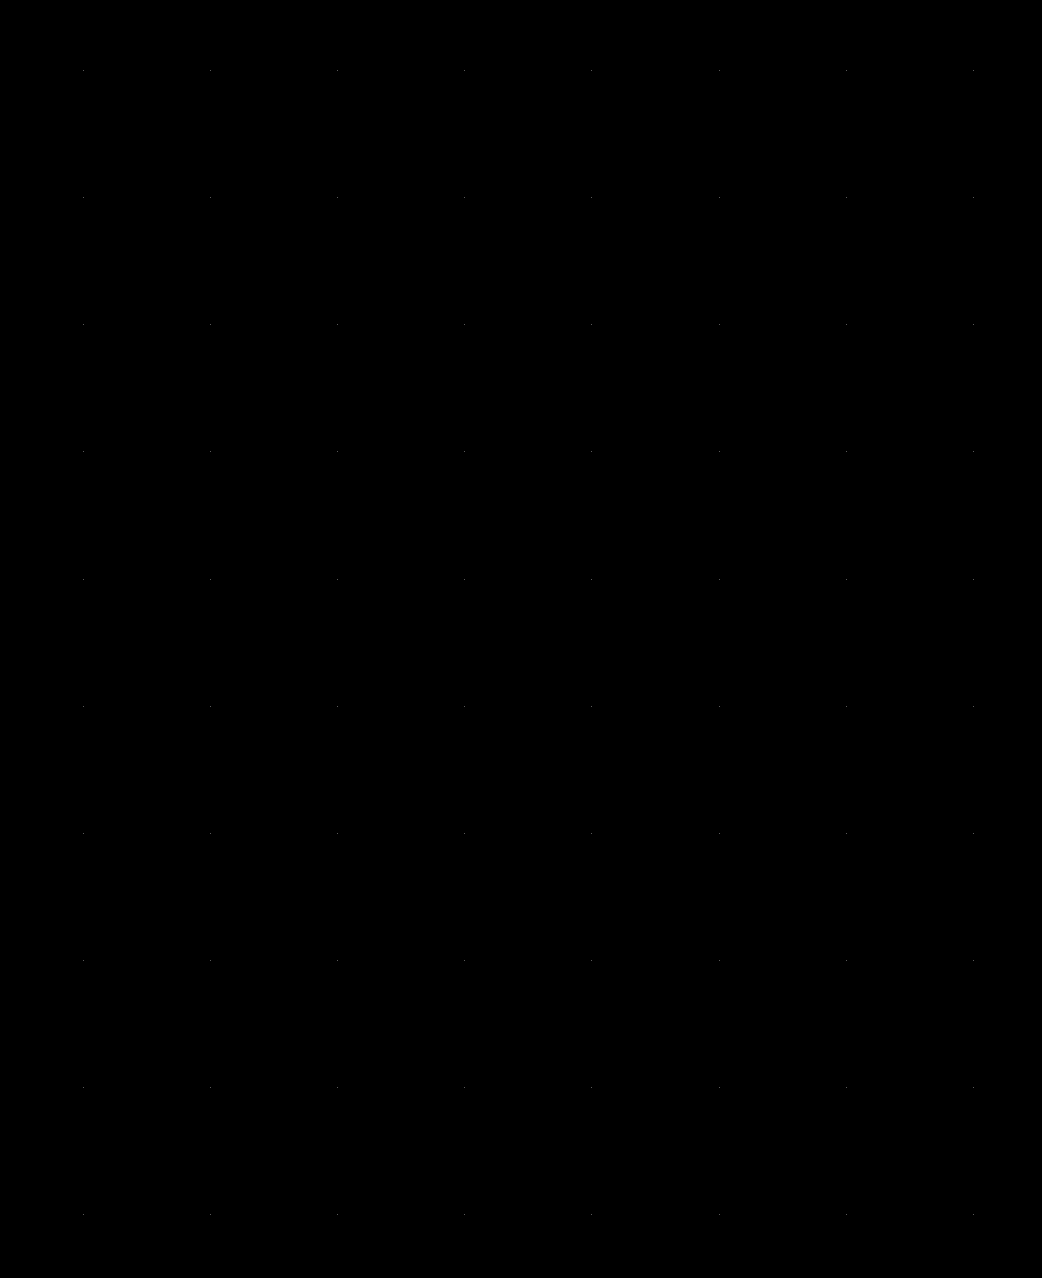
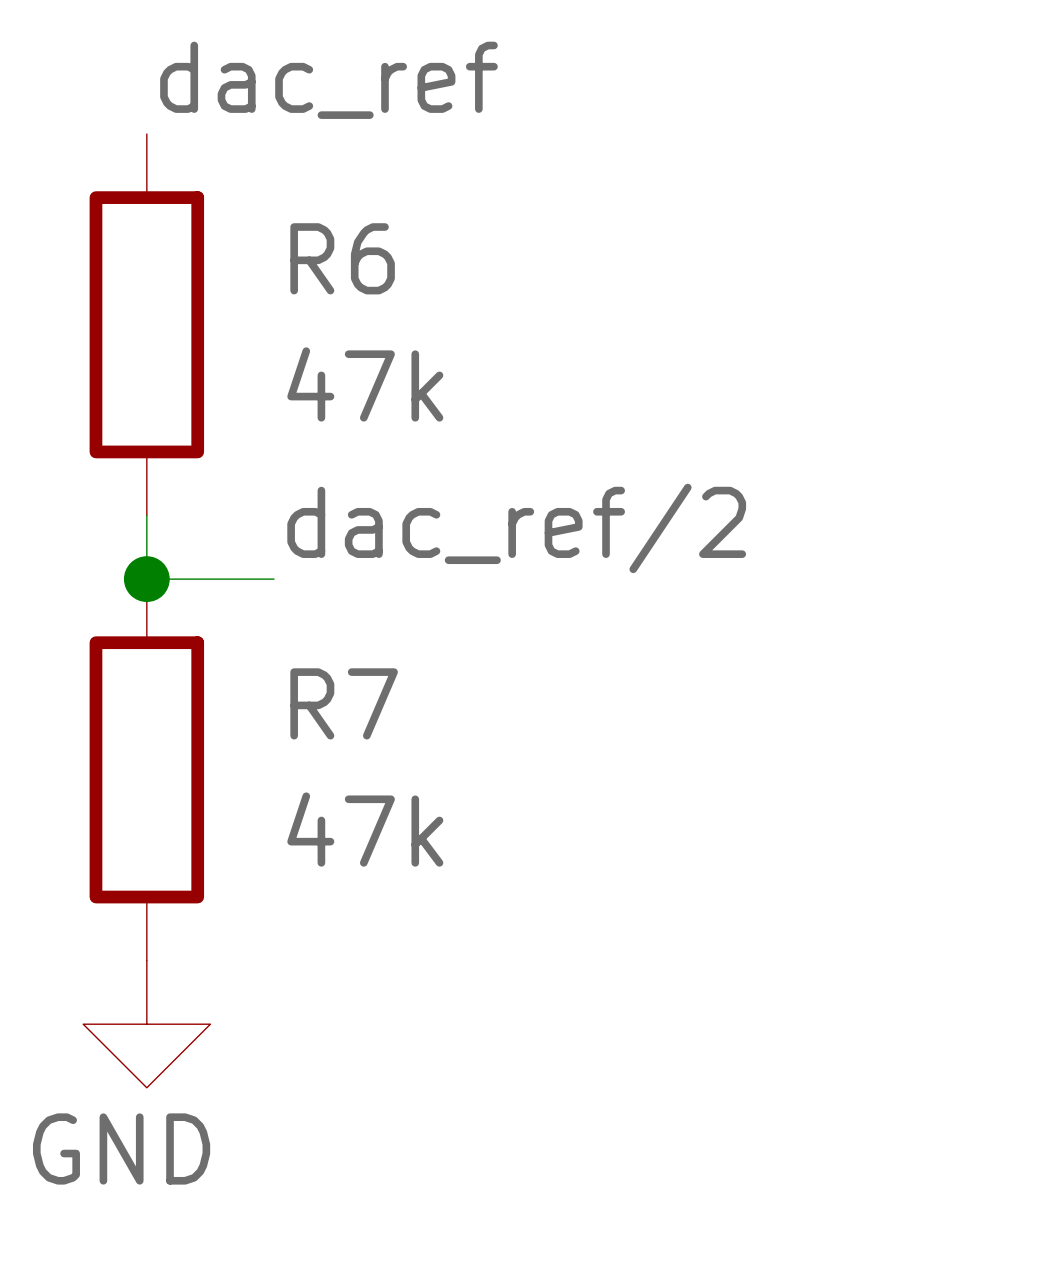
label: none -> dac_ref (328, 80)
R6: none -> 47k (146, 324)
wire: none -> (146, 515) (146, 579) (274, 579)
label: none -> dac_ref/2 (516, 528)
junction: none -> (146, 579)
R7: none -> 47k (146, 769)
power symbol: none -> GND (146, 1024)

